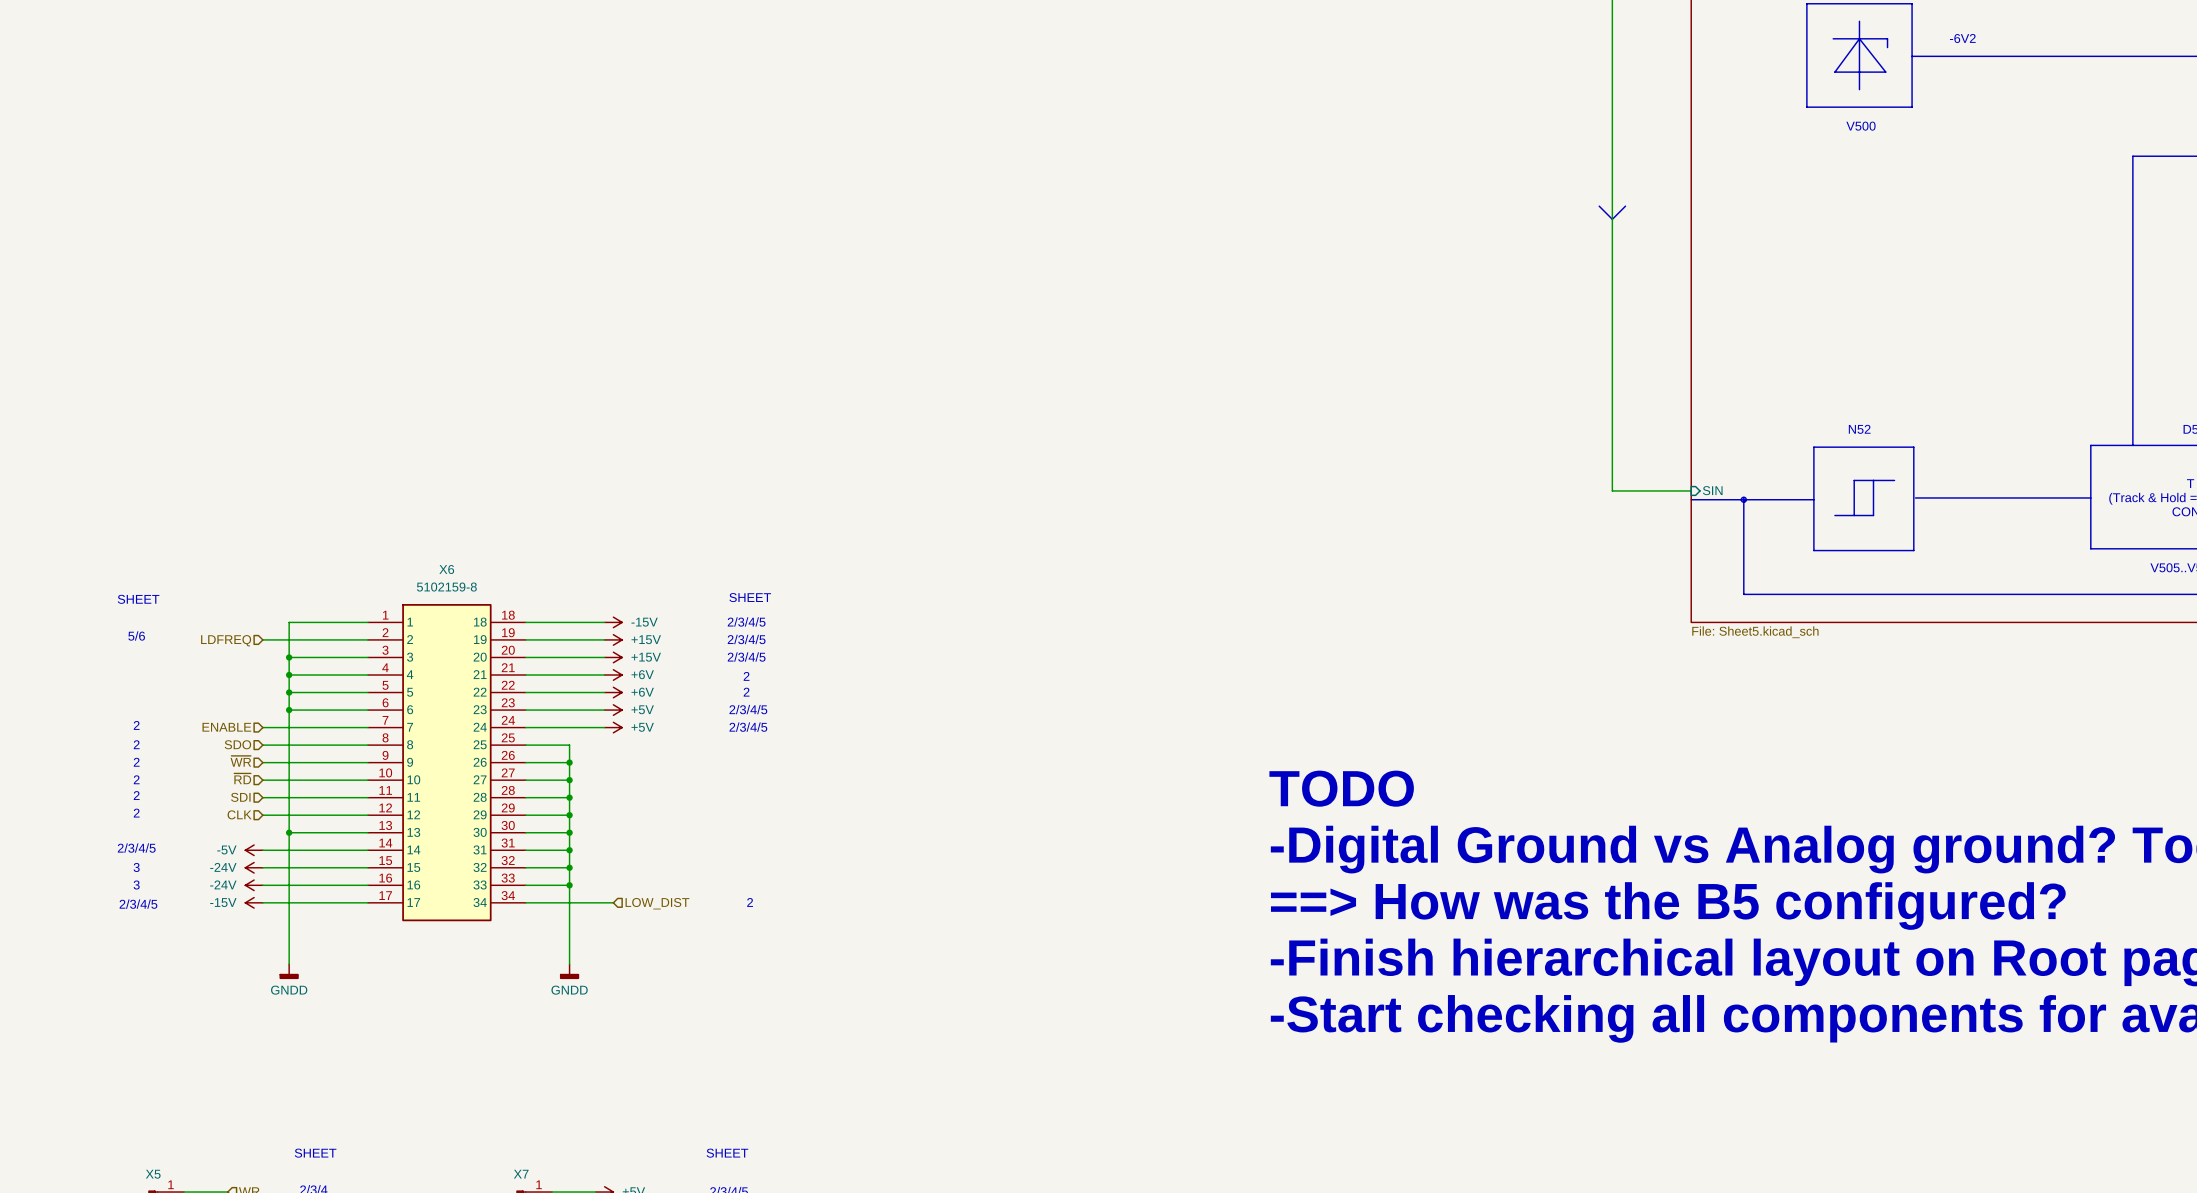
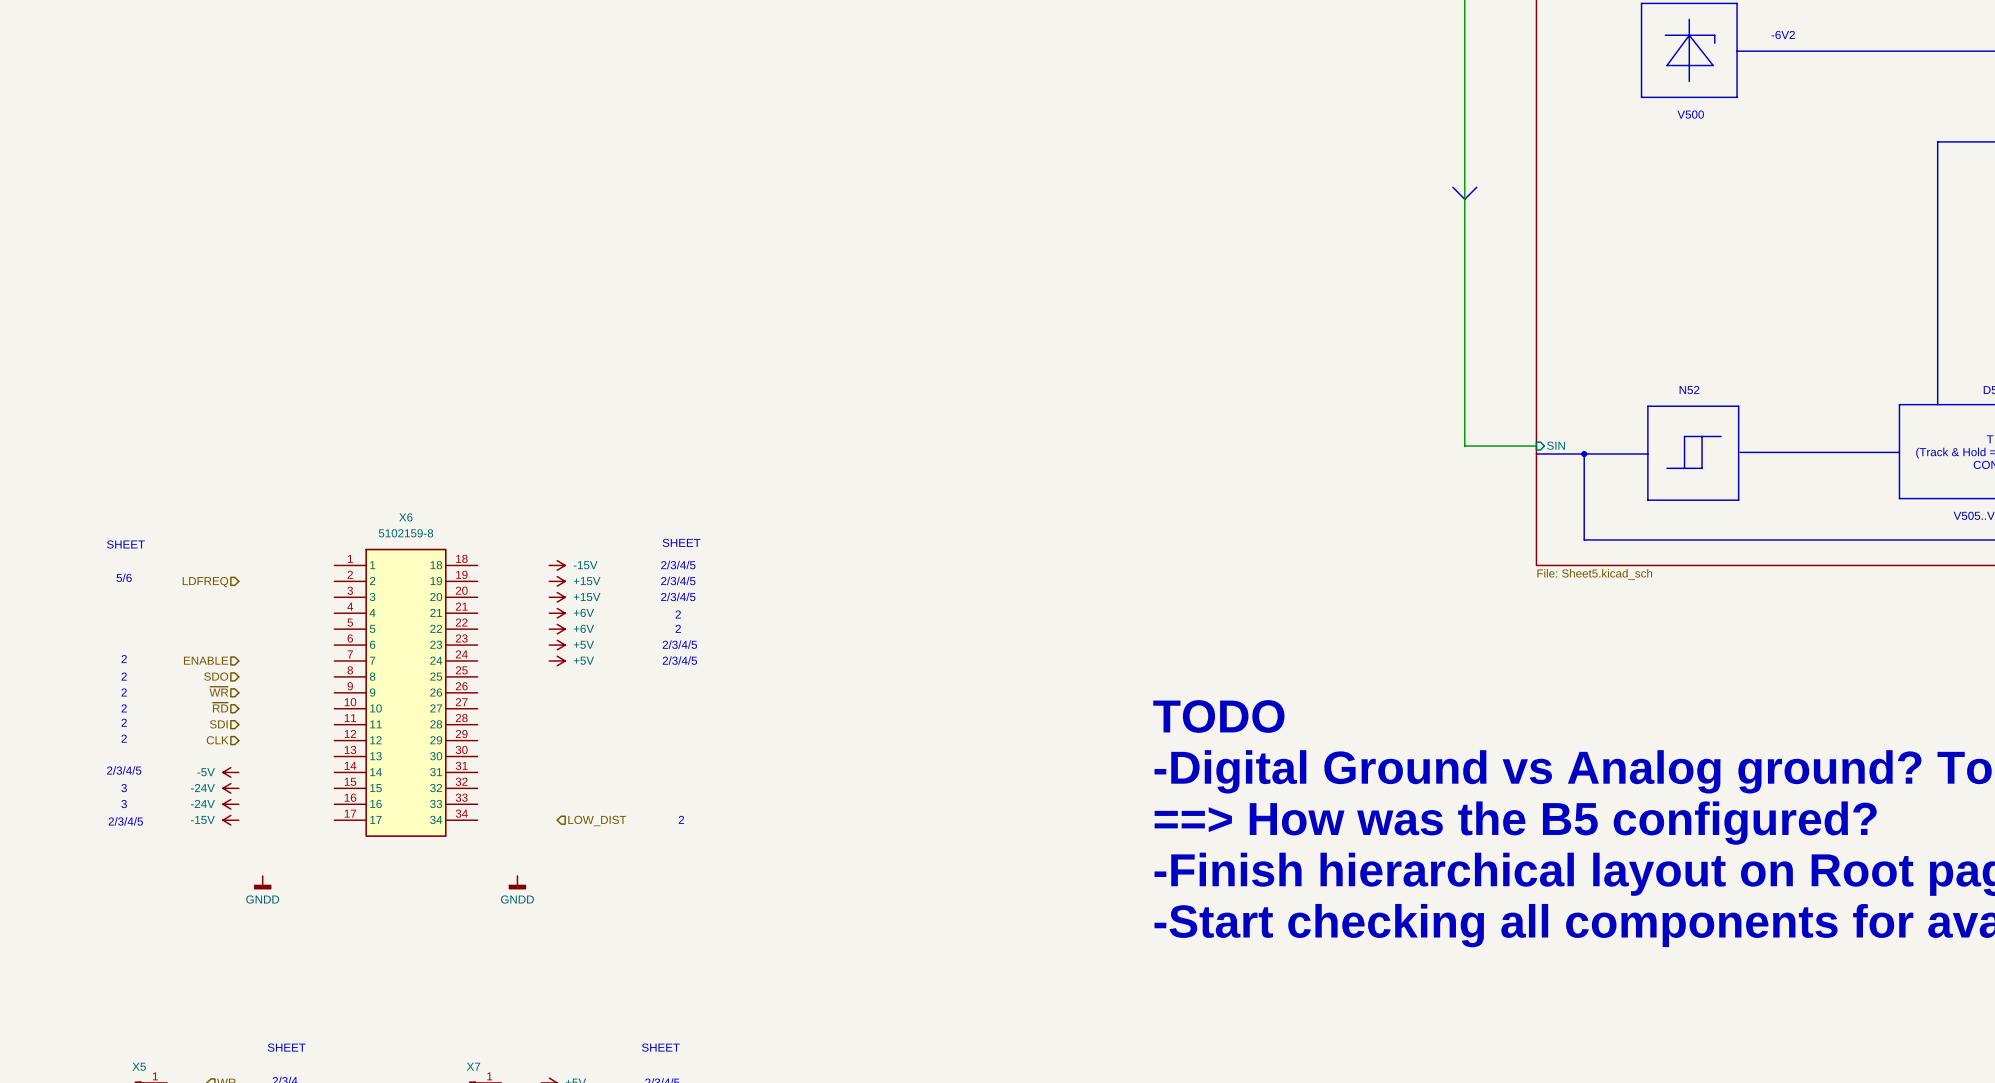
wire: (368, 622) (289, 622) (289, 964) -> none
wire: (525, 622) (604, 622) -> none
wire: (262, 639) (368, 639) -> none
wire: (525, 639) (604, 639) -> none
wire: (289, 657) (368, 657) -> none
junction: (289, 657) -> none
wire: (525, 657) (604, 657) -> none
wire: (289, 675) (368, 675) -> none
junction: (289, 675) -> none
wire: (525, 675) (604, 675) -> none
wire: (289, 692) (368, 692) -> none
junction: (289, 692) -> none
wire: (525, 692) (604, 692) -> none
wire: (289, 710) (368, 710) -> none
junction: (289, 710) -> none
wire: (525, 710) (604, 710) -> none
wire: (262, 727) (368, 727) -> none
wire: (525, 727) (604, 727) -> none
wire: (262, 745) (368, 745) -> none
wire: (525, 745) (569, 745) (569, 964) -> none
wire: (262, 762) (368, 762) -> none
wire: (525, 762) (569, 762) -> none
junction: (569, 762) -> none
wire: (262, 780) (368, 780) -> none
wire: (525, 780) (569, 780) -> none
junction: (569, 780) -> none
wire: (262, 797) (368, 797) -> none
wire: (525, 797) (569, 797) -> none
junction: (569, 797) -> none
wire: (262, 815) (368, 815) -> none
wire: (525, 815) (569, 815) -> none
junction: (569, 815) -> none
wire: (289, 832) (368, 832) -> none
junction: (289, 832) -> none
wire: (525, 832) (569, 832) -> none
junction: (569, 832) -> none
wire: (262, 850) (368, 850) -> none
wire: (525, 850) (569, 850) -> none
junction: (569, 850) -> none
wire: (262, 867) (368, 867) -> none
wire: (525, 867) (569, 867) -> none
junction: (569, 867) -> none
wire: (262, 885) (368, 885) -> none
wire: (525, 885) (569, 885) -> none
junction: (569, 885) -> none
wire: (262, 902) (368, 902) -> none
wire: (525, 902) (613, 902) -> none
wire: (183, 1192) (227, 1192) -> none
wire: (552, 1192) (595, 1192) -> none

